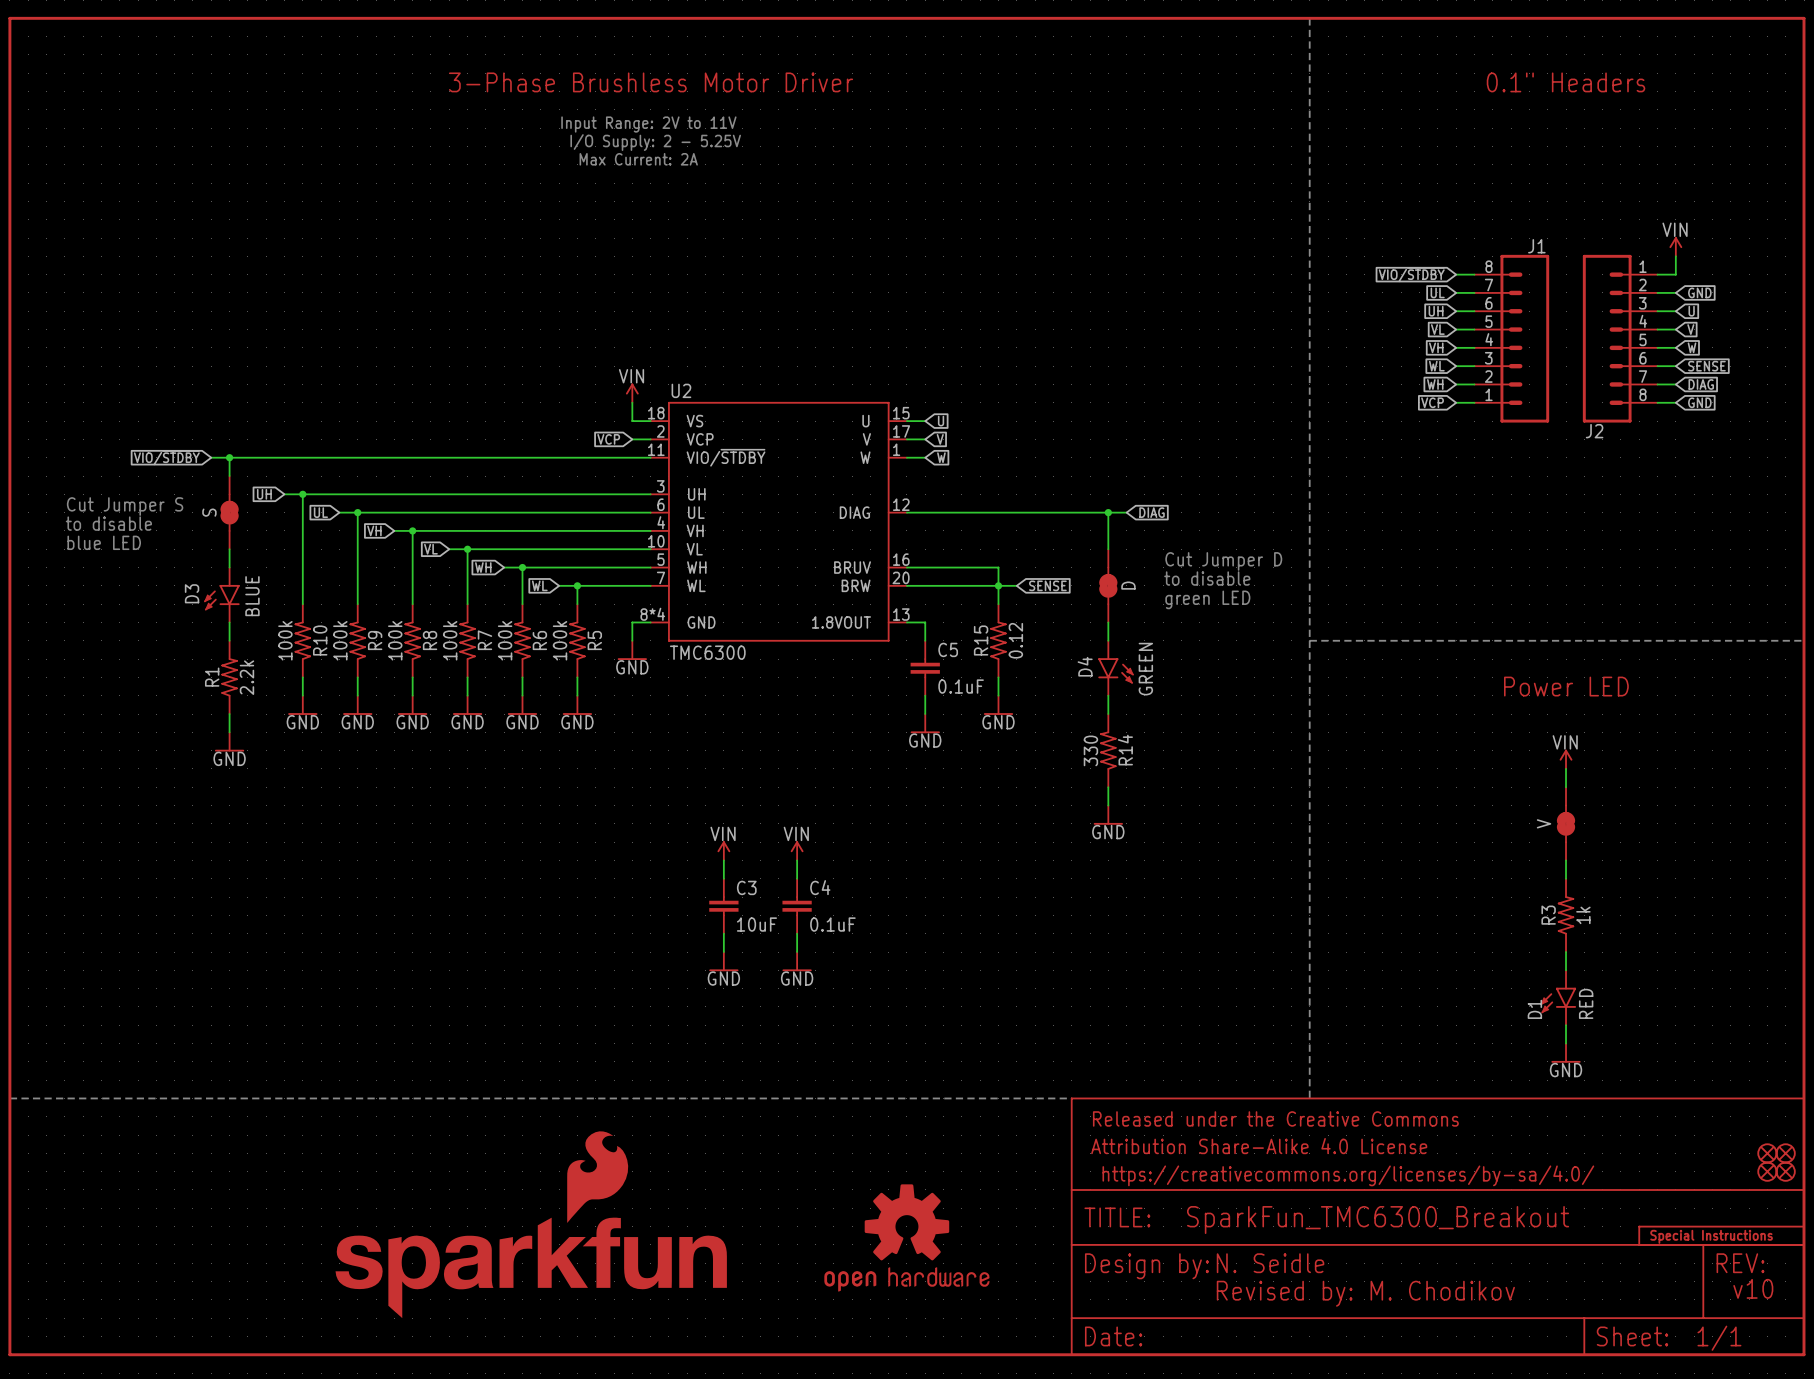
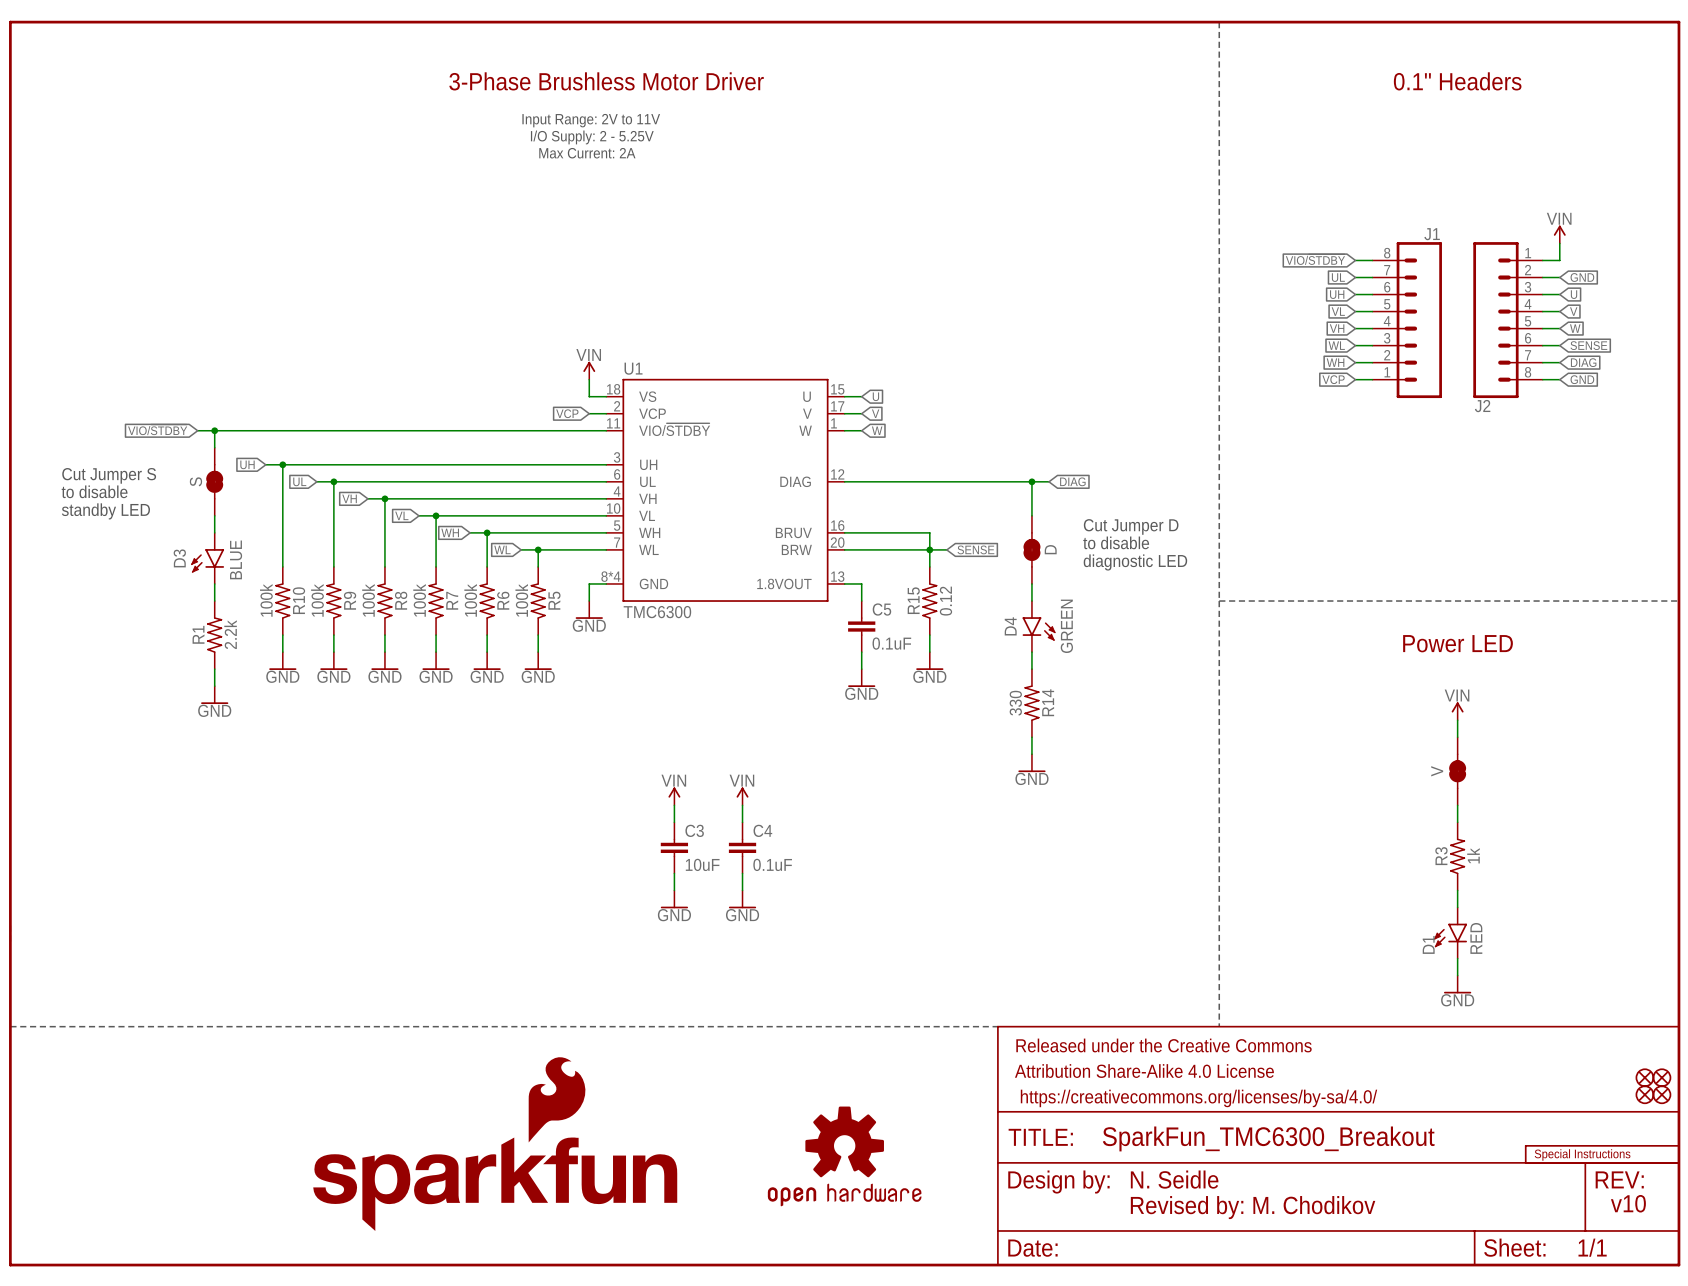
U2 name: U2 (681, 390) -> U1 (633, 368)
text: blue LED (104, 542) -> standby LED (105, 511)
text: green LED (1207, 599) -> diagnostic LED (1135, 562)

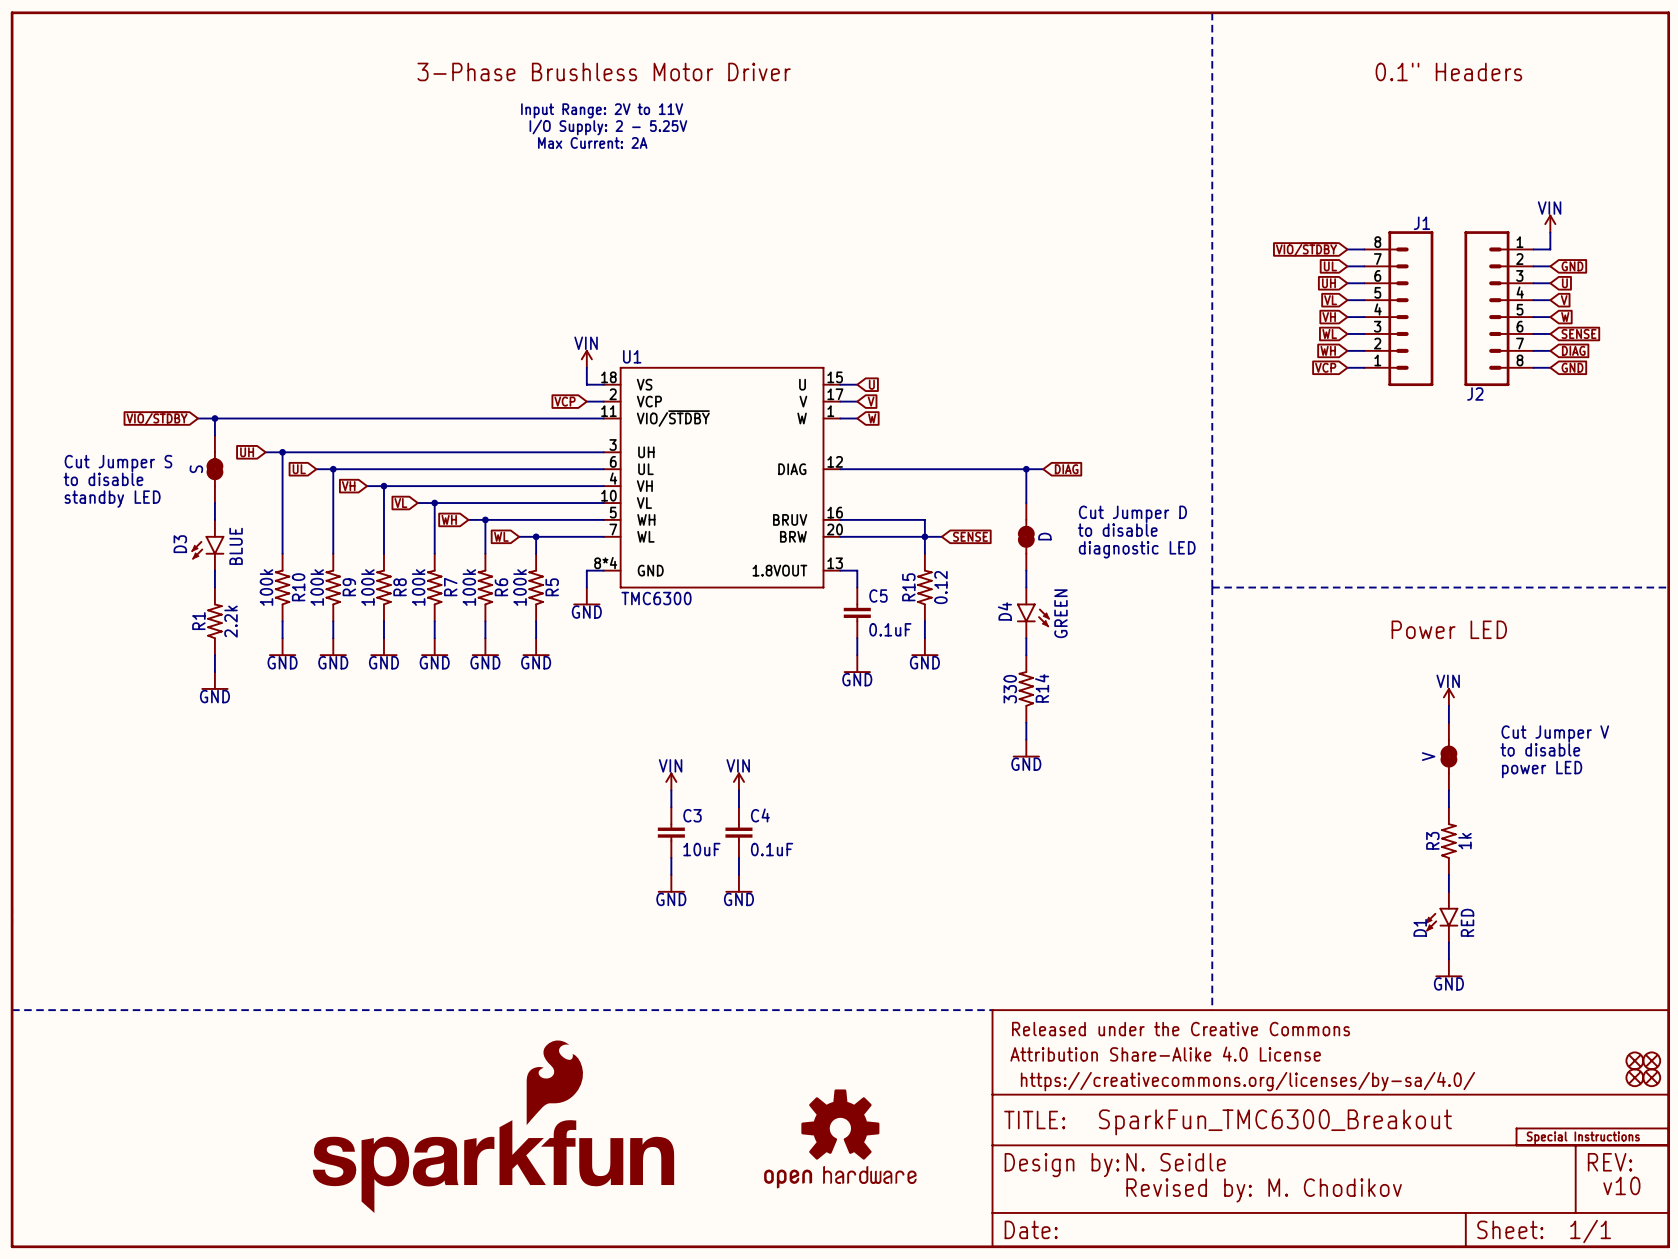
text: none -> Cut Jumper V (1555, 734)
text: none -> to disable (1540, 749)
text: none -> power LED (1542, 769)

